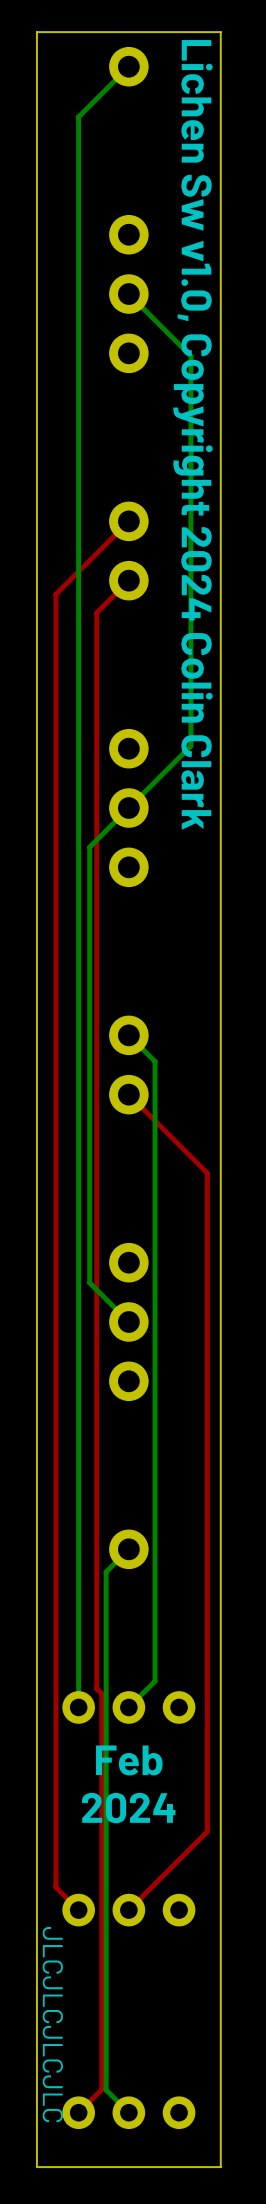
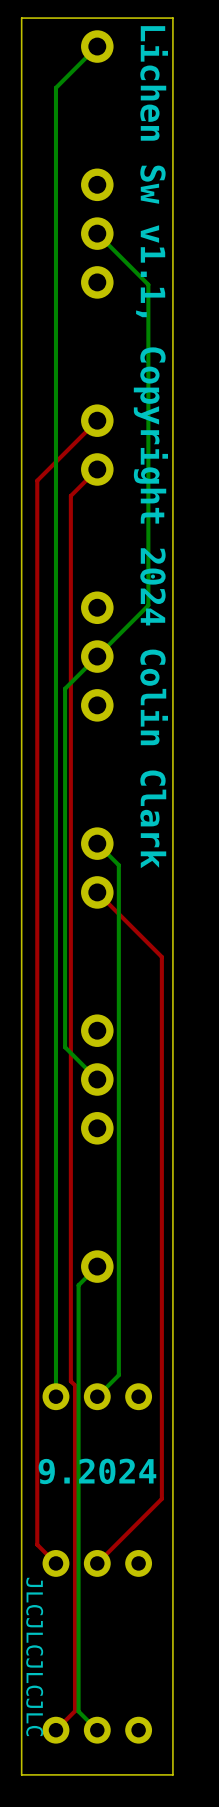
text: Lichen Sw v1.0, Copyright 2024 Colin Clark (192, 434) -> Lichen Sw v1.1, Copyright 2024 Colin Clark (150, 447)
text: Feb (129, 1760) -> none
text: 2024 (128, 1808) -> 9.2024 (97, 1471)

